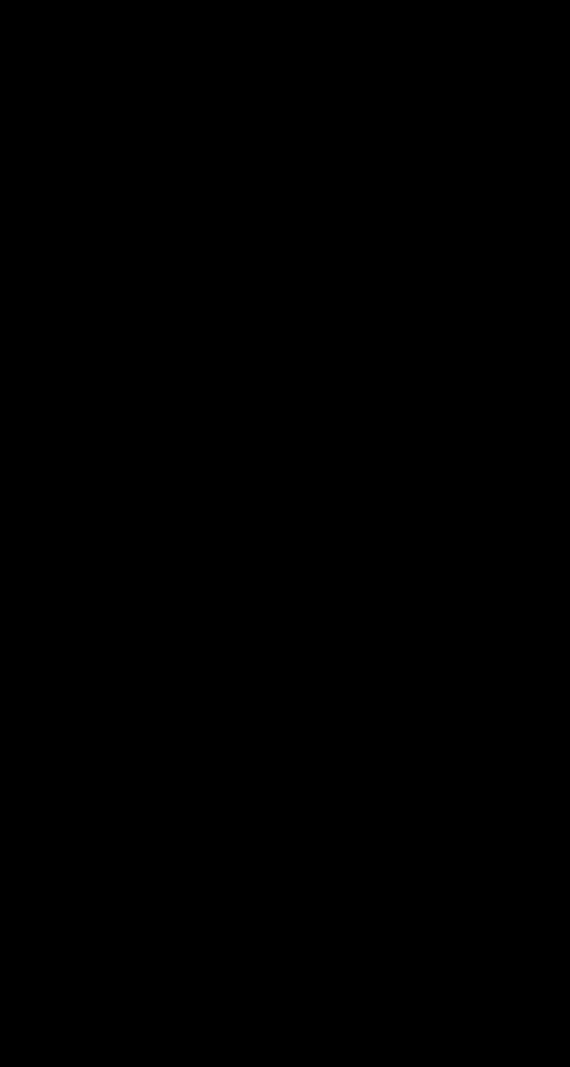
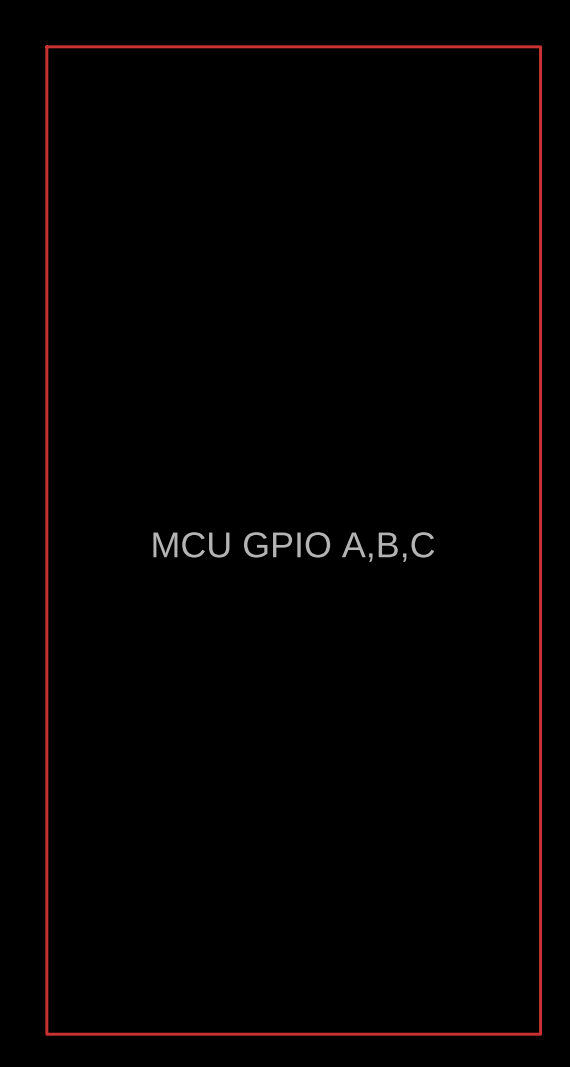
sheet MCU GPIO A,B,C: none -> (293, 540)

